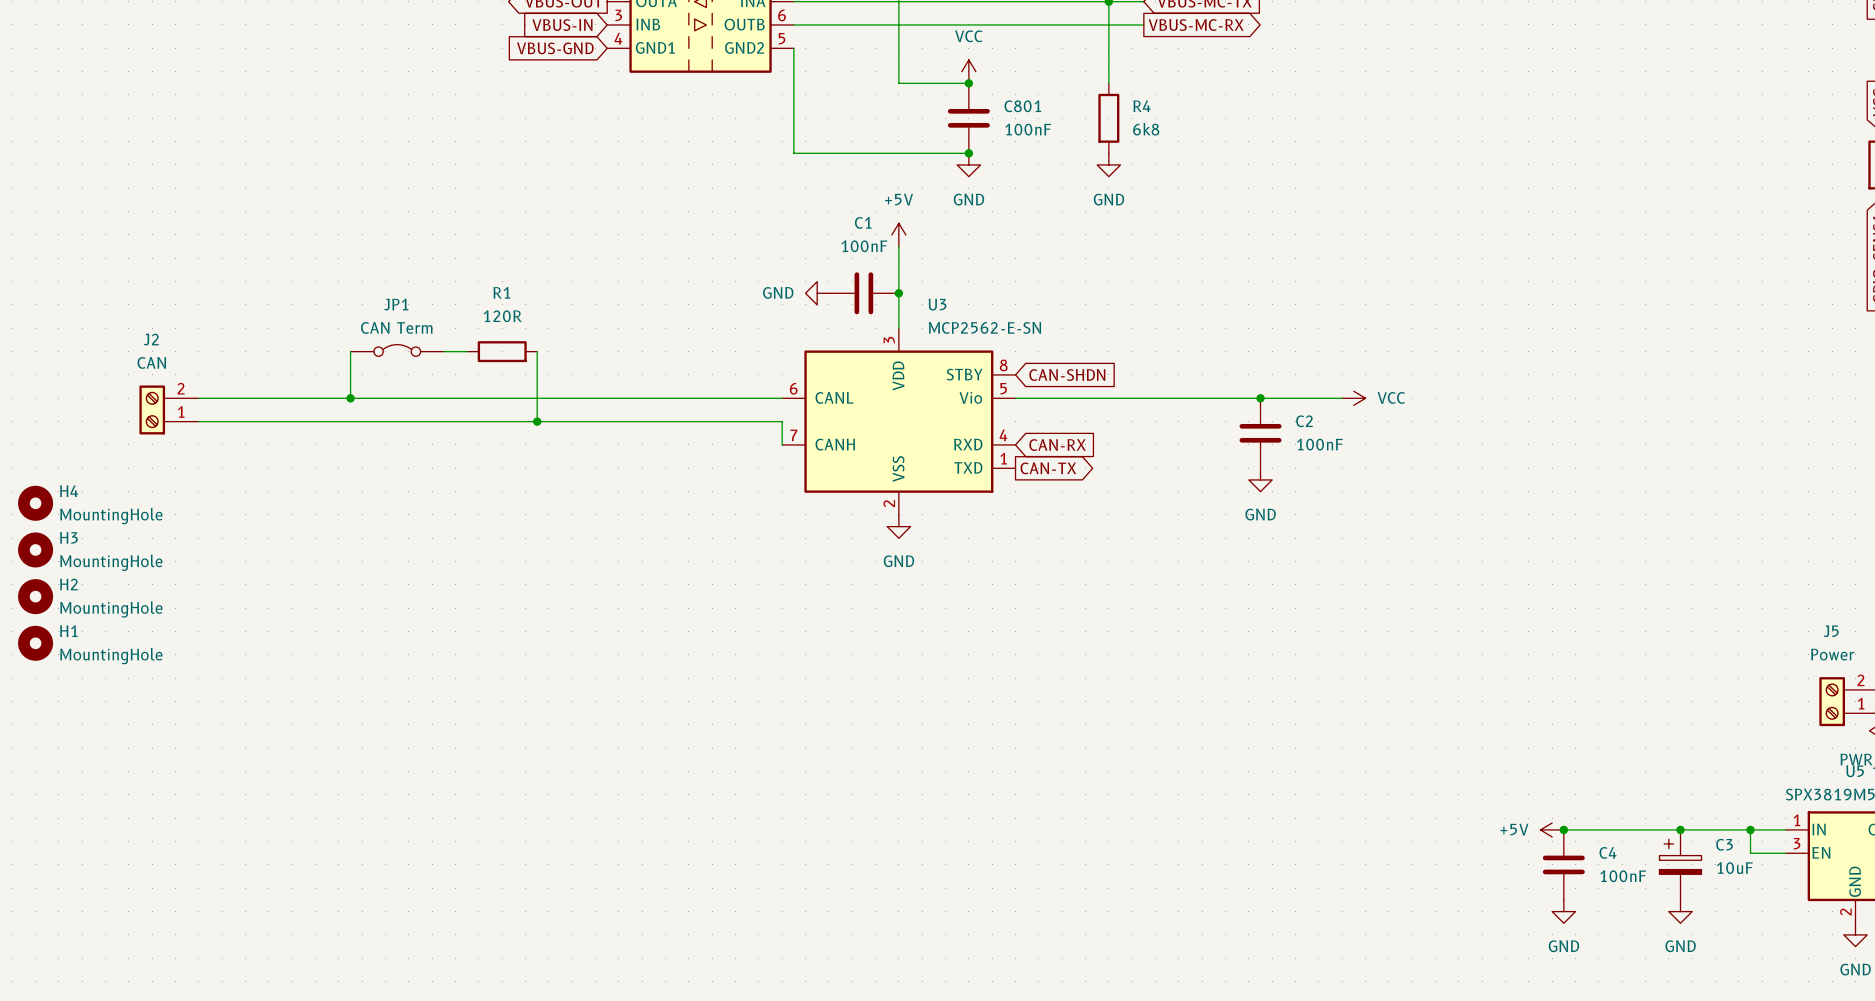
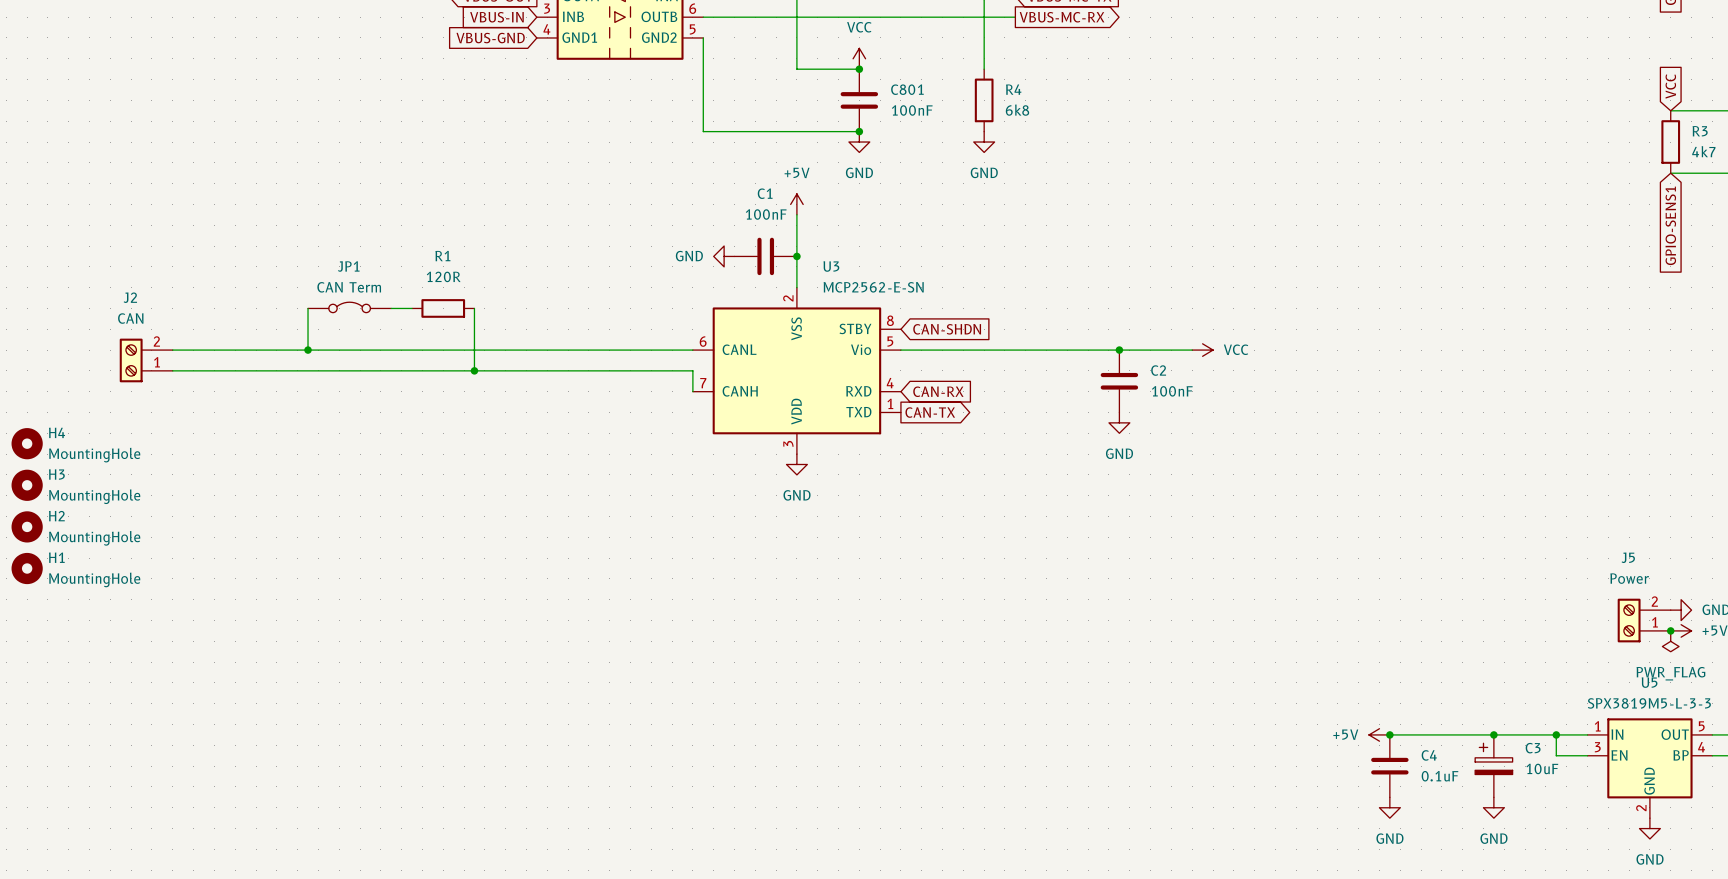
U3 pin number: 3 (889, 340) -> 2 (788, 298)
U3 pin name: VDD (898, 375) -> VSS (796, 328)
U3 pin name: VSS (898, 468) -> VDD (796, 411)
U3 pin number: 2 (889, 503) -> 3 (788, 443)
C4 value: 100nF (1623, 876) -> 0.1uF (1440, 776)

